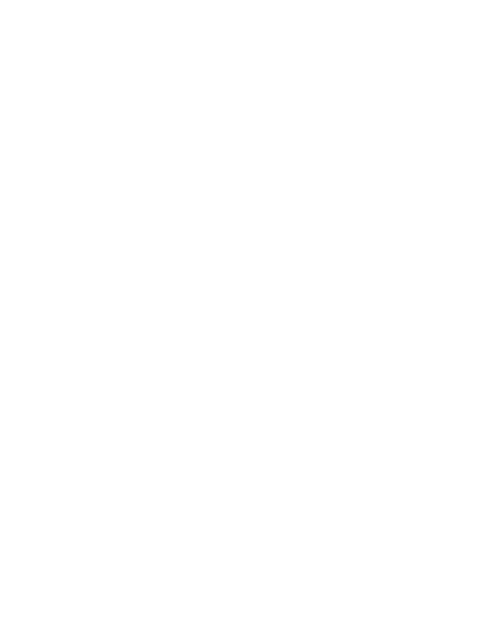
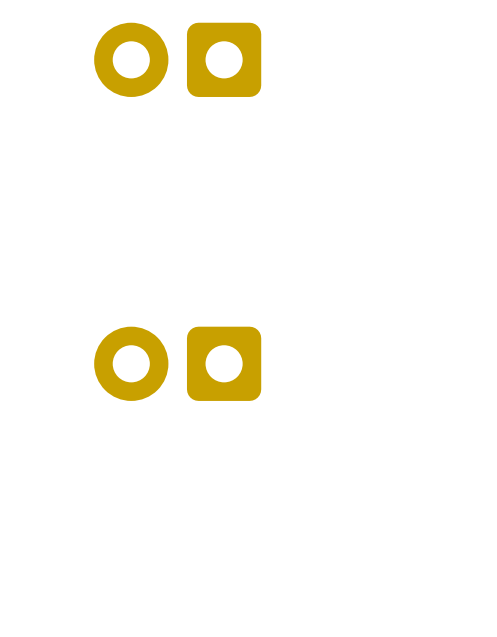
part: none -> (177, 59)
part: none -> (177, 363)

